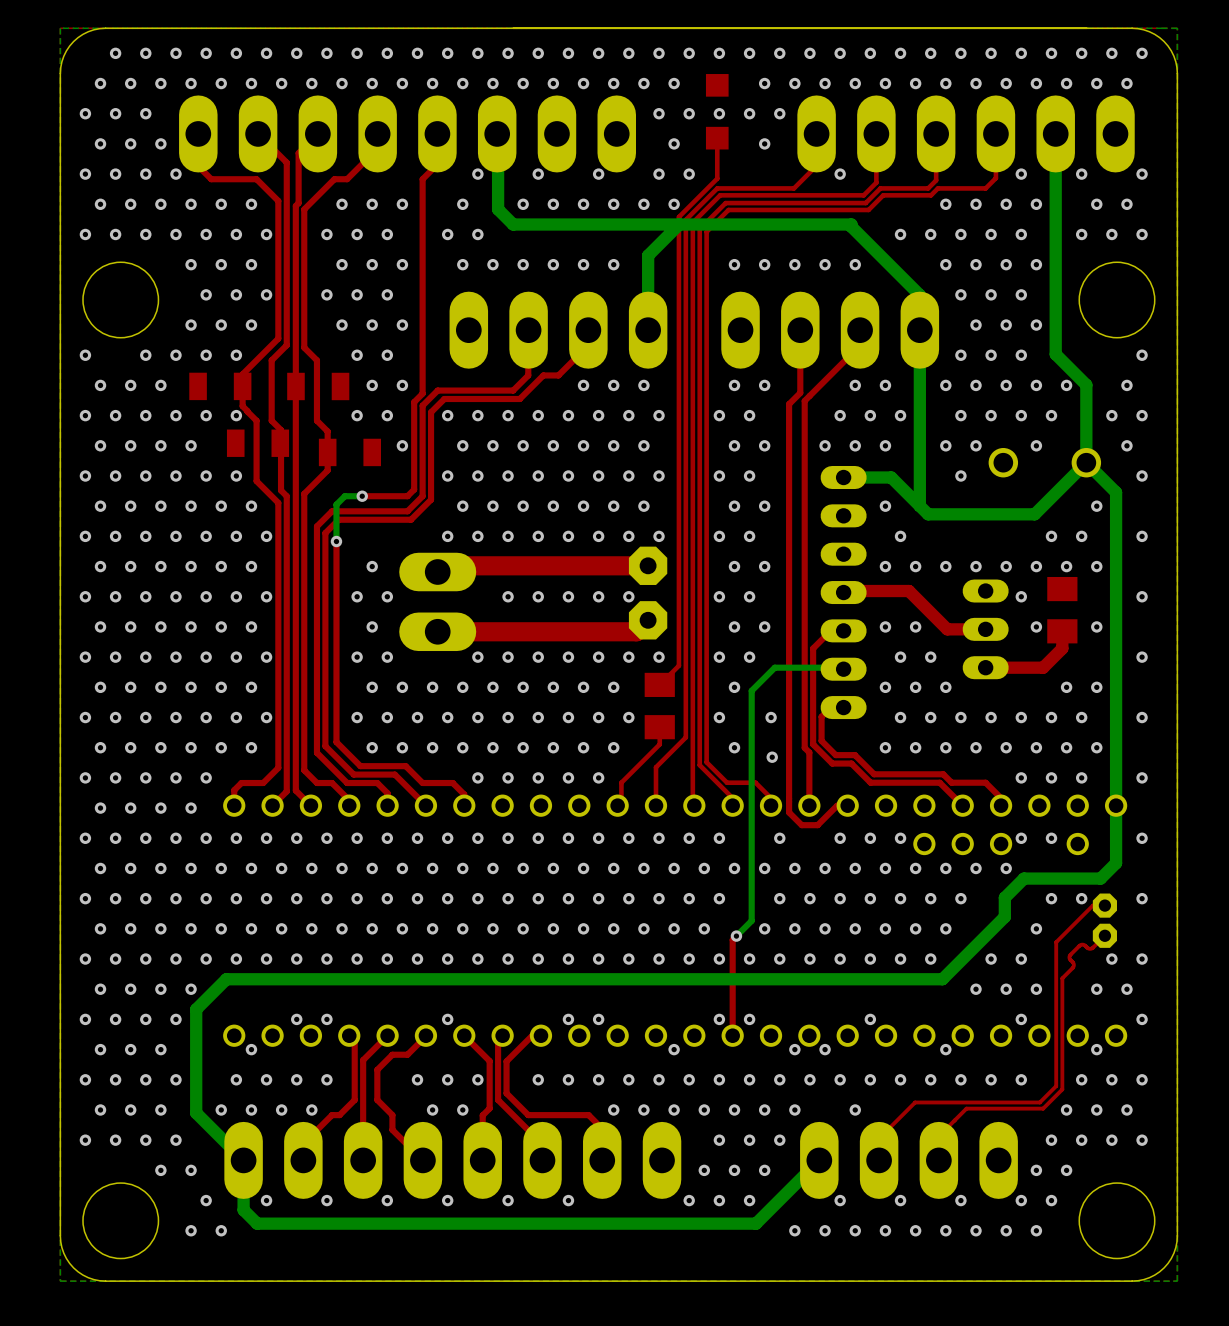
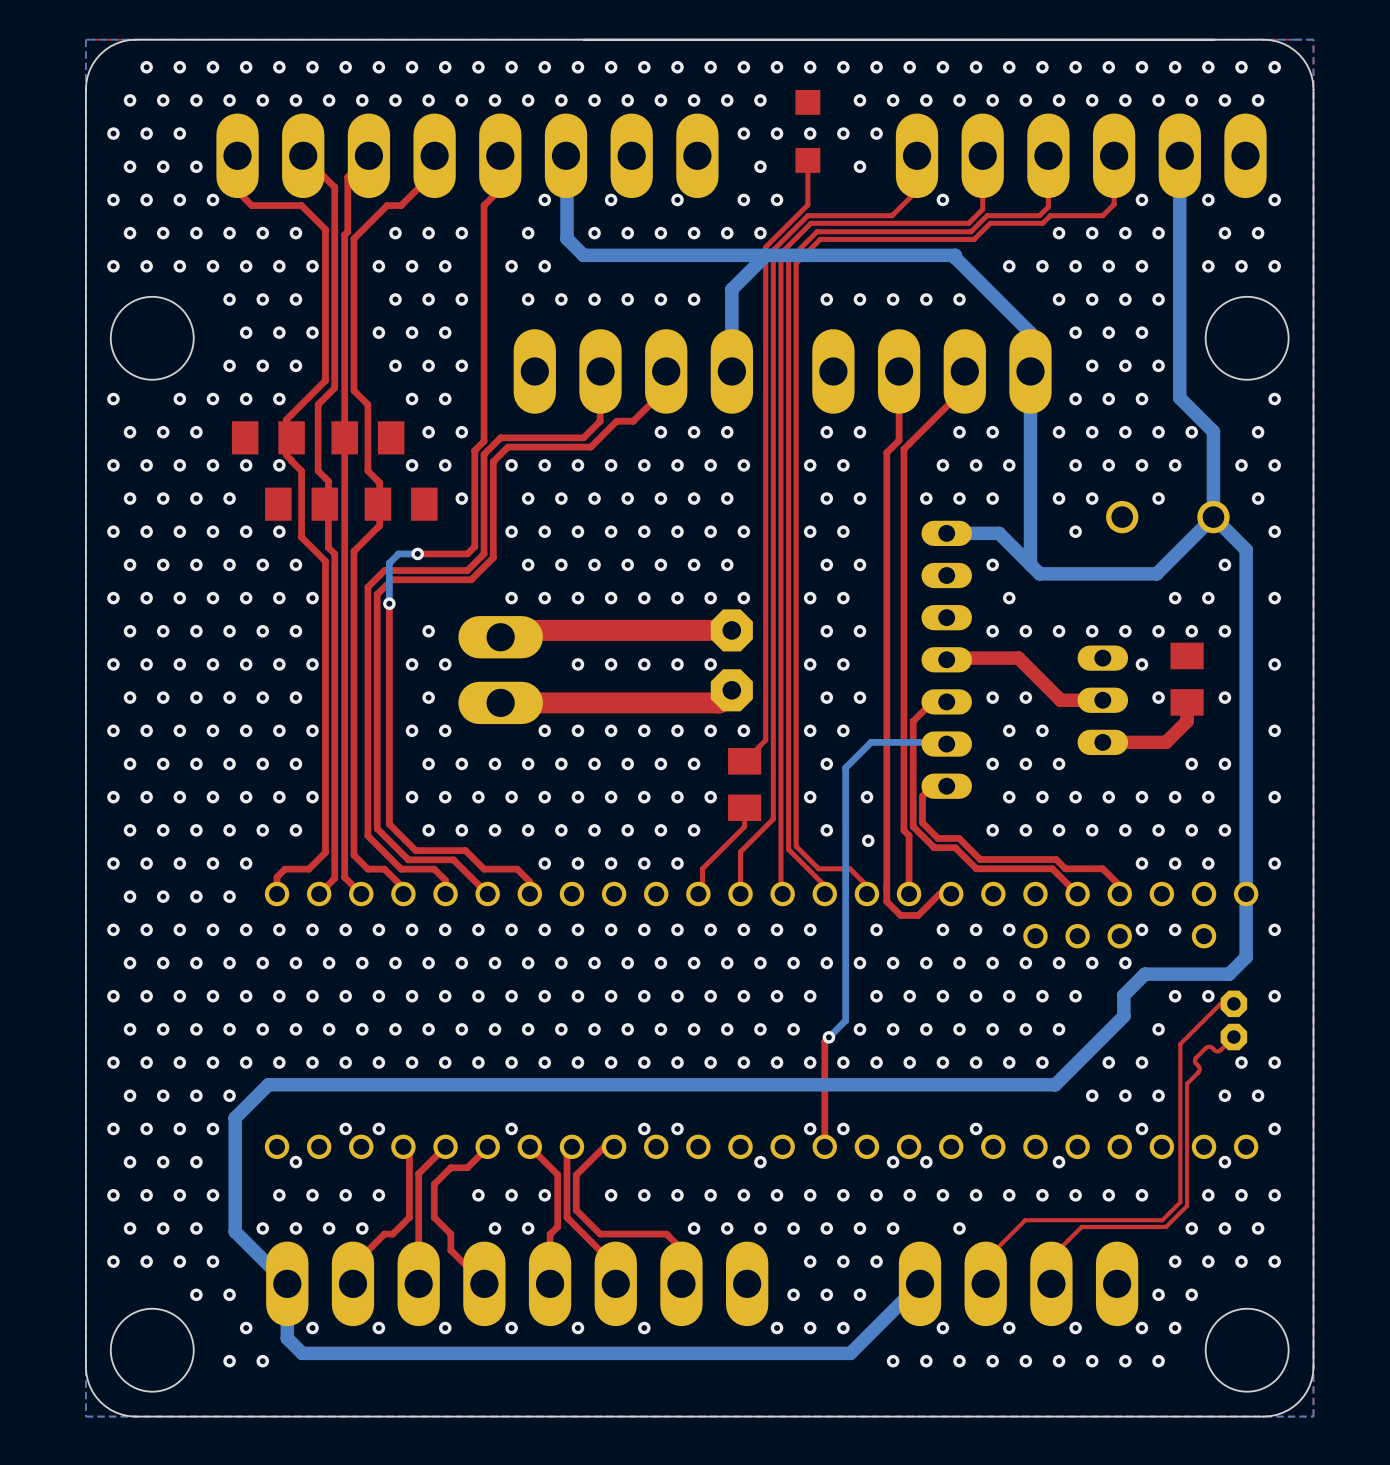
part footprint: [189, 372, 252, 401] -> [231, 421, 305, 455]
part footprint: [287, 372, 350, 401] -> [331, 421, 405, 455]
part footprint: [226, 429, 290, 457] -> [265, 487, 339, 521]
part footprint: [318, 438, 382, 467] -> [364, 487, 438, 521]

